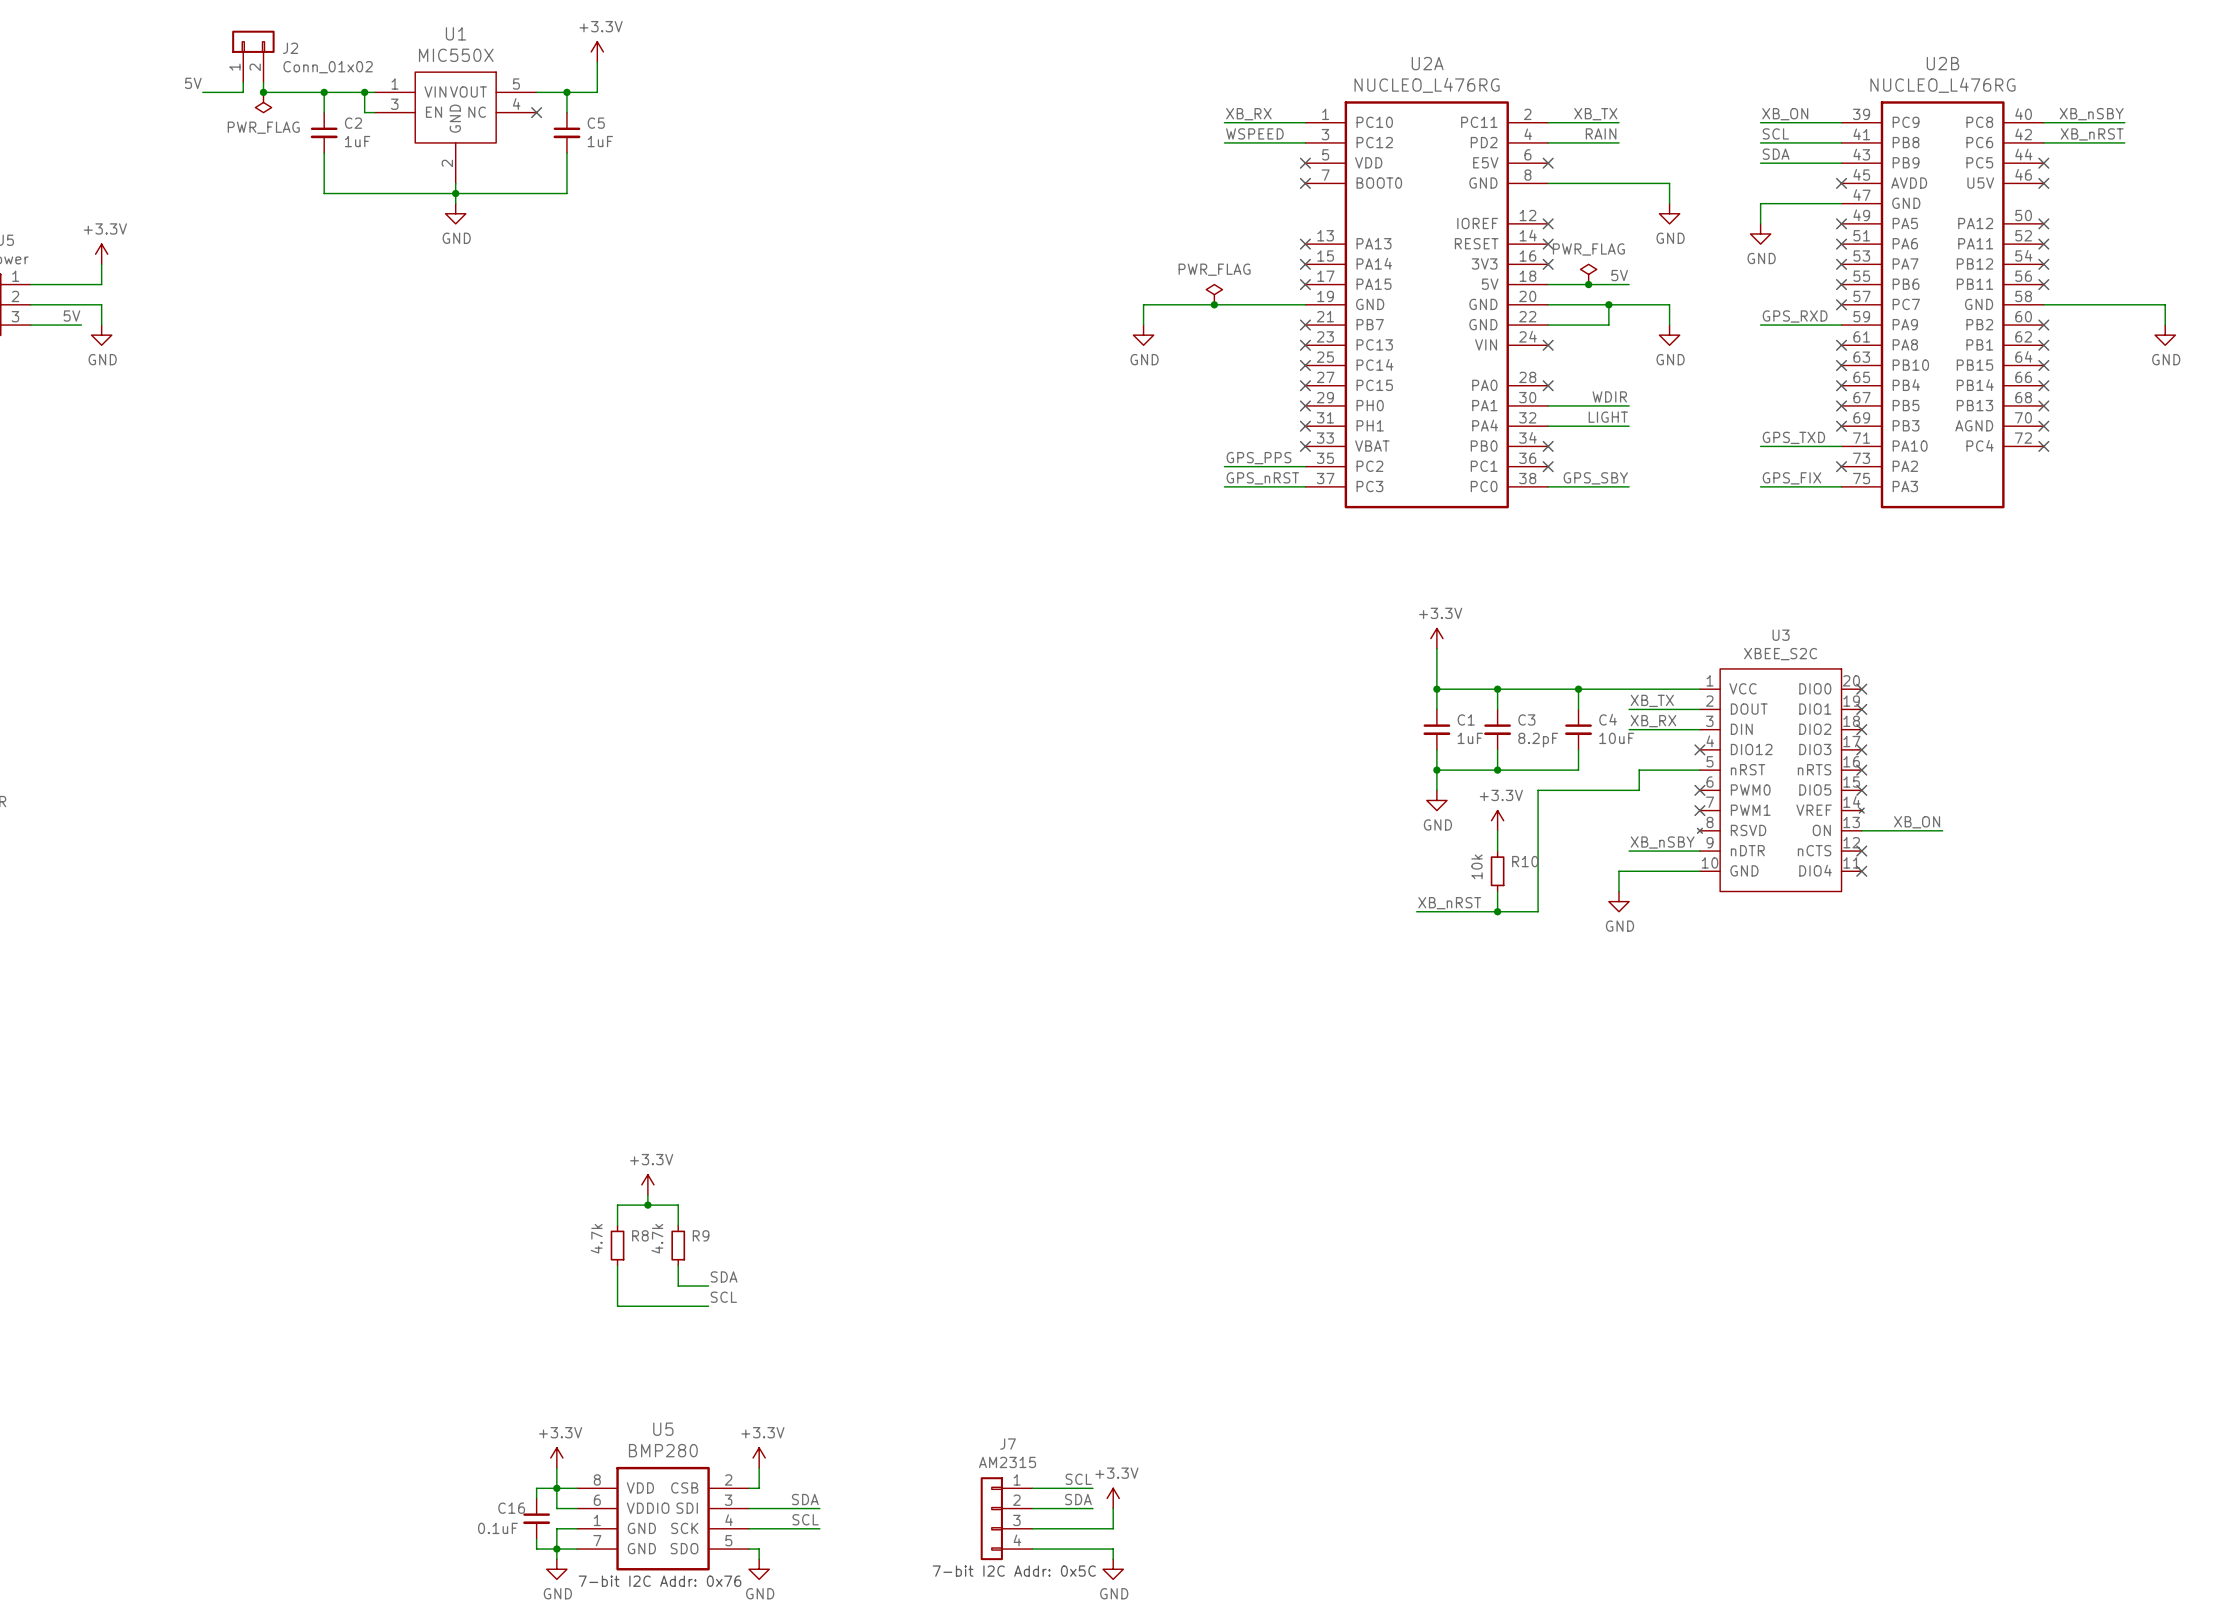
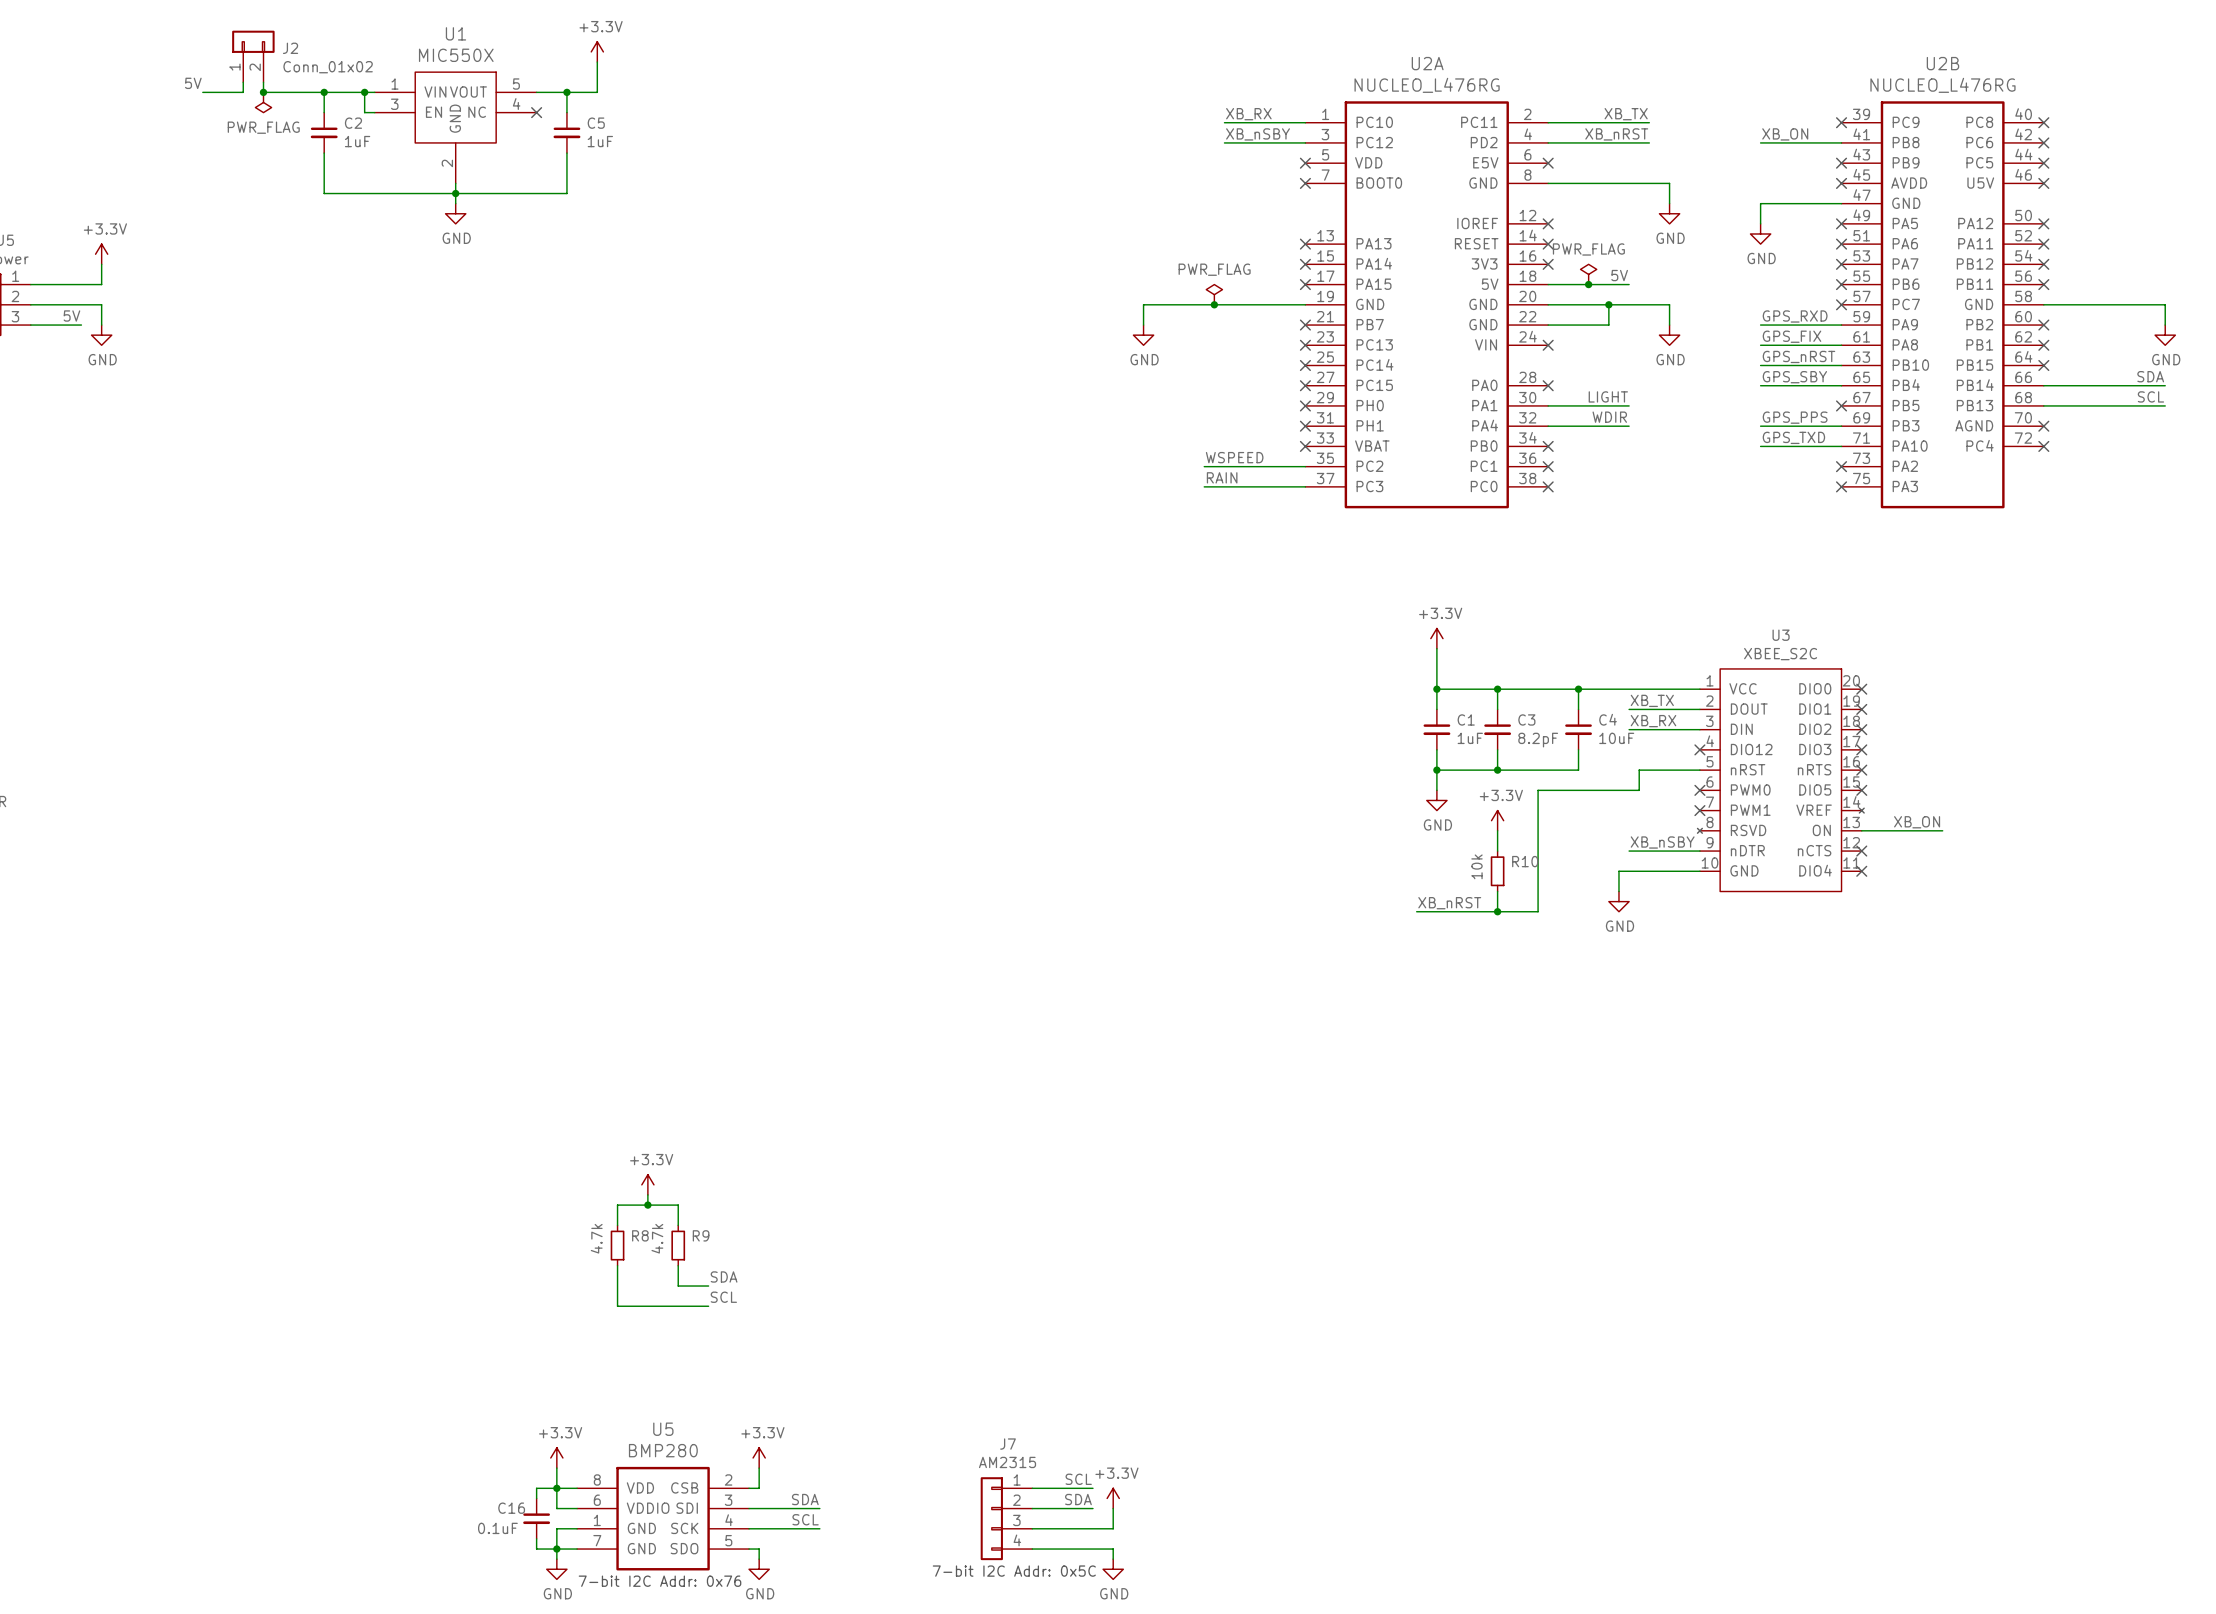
label position: XB_TX (1595, 114) -> XB_TX (1626, 114)
label: XB_ON (1785, 114) -> none
label: XB_nSBY (2091, 114) -> none
wire: none -> (1618, 122) (1649, 122)
wire: (1760, 122) (1841, 122) -> none
no-connect mark: none -> (1841, 122)
wire: (2043, 122) (2124, 122) -> none
no-connect mark: none -> (2043, 122)
label: WSPEED (1254, 133) -> XB_nSBY (1258, 134)
label: RAIN (1601, 133) -> none
label: SCL (1775, 133) -> XB_ON (1785, 134)
label: none -> XB_nRST (1616, 134)
label: XB_nRST (2092, 134) -> none
wire: none -> (1618, 142) (1649, 142)
wire: (2043, 142) (2124, 142) -> none
no-connect mark: none -> (2043, 142)
label: SDA (1776, 154) -> none
wire: (1760, 163) (1841, 163) -> (1760, 345) (1841, 345)
no-connect mark: none -> (1841, 163)
no-connect mark: (1841, 345) -> none
label: none -> GPS_nRST (1798, 356)
wire: none -> (1760, 365) (1841, 365)
no-connect mark: (1841, 365) -> none
label: none -> SDA (2150, 376)
wire: none -> (1760, 385) (1841, 385)
no-connect mark: (1841, 385) -> none
wire: none -> (2043, 385) (2165, 385)
no-connect mark: (2043, 385) -> none
label: WDIR (1609, 396) -> LIGHT (1608, 396)
label: none -> SCL (2150, 396)
wire: none -> (2043, 405) (2165, 405)
no-connect mark: (2043, 405) -> none
label: LIGHT (1608, 417) -> WDIR (1609, 417)
label: none -> GPS_PPS (1795, 417)
no-connect mark: (1841, 426) -> none
label: none -> WSPEED (1234, 457)
label: GPS_PPS (1258, 458) -> none
wire: none -> (1204, 466) (1224, 466)
label: none -> RAIN (1222, 477)
label: GPS_nRST (1262, 478) -> none
label position: GPS_SBY (1595, 478) -> GPS_SBY (1794, 377)
label position: GPS_FIX (1791, 478) -> GPS_FIX (1791, 336)
wire: none -> (1204, 486) (1224, 486)
wire: (1548, 486) (1629, 486) -> none
no-connect mark: none -> (1548, 486)
wire: (1760, 486) (1841, 486) -> (1760, 426) (1841, 426)
no-connect mark: none -> (1841, 486)

